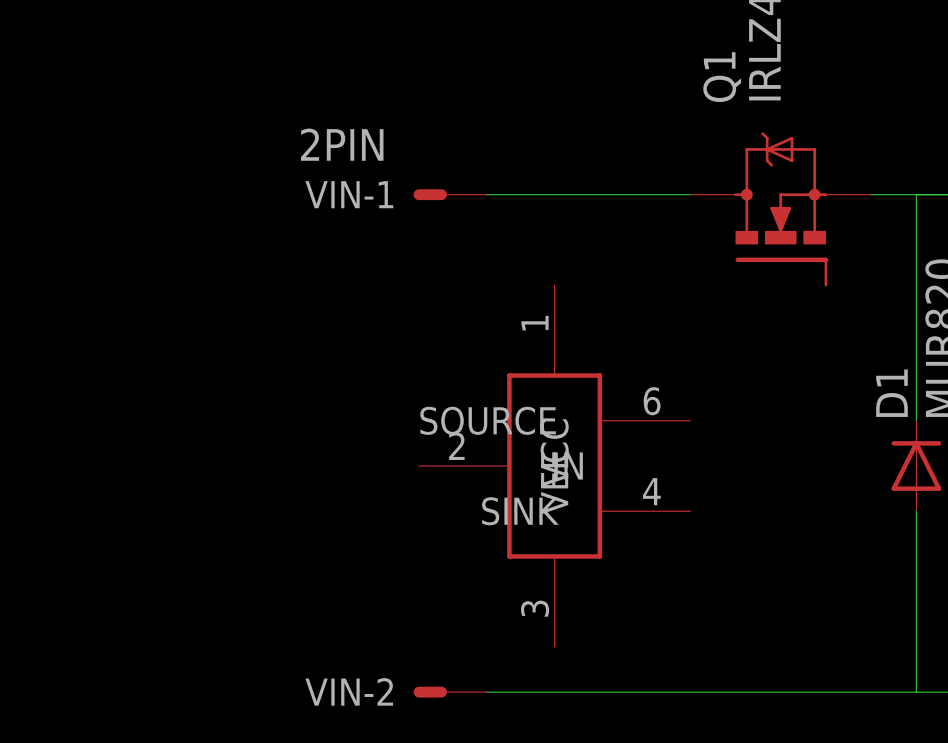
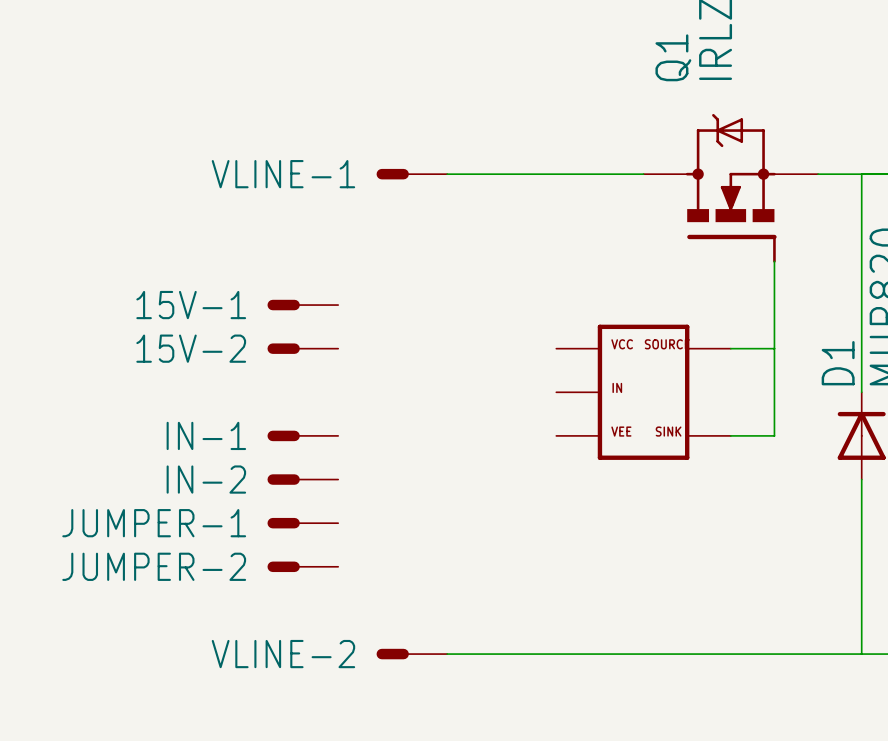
VIN-1 value: 2PIN (342, 144) -> none
VIN-1 name: VIN-1 (349, 194) -> VLINE-1 (283, 174)
wire: none -> (774, 261) (774, 435) (730, 435)
15V-1: none -> (302, 305)
15V-2: none -> (302, 348)
wire: none -> (730, 348) (774, 348)
part: none -> (643, 392)
IN-1: none -> (302, 435)
part: (554, 466) -> none
IN-2: none -> (302, 479)
JUMPER-1: none -> (302, 523)
JUMPER-2: none -> (302, 566)
VIN-2 name: VIN-2 (349, 691) -> VLINE-2 (283, 654)

